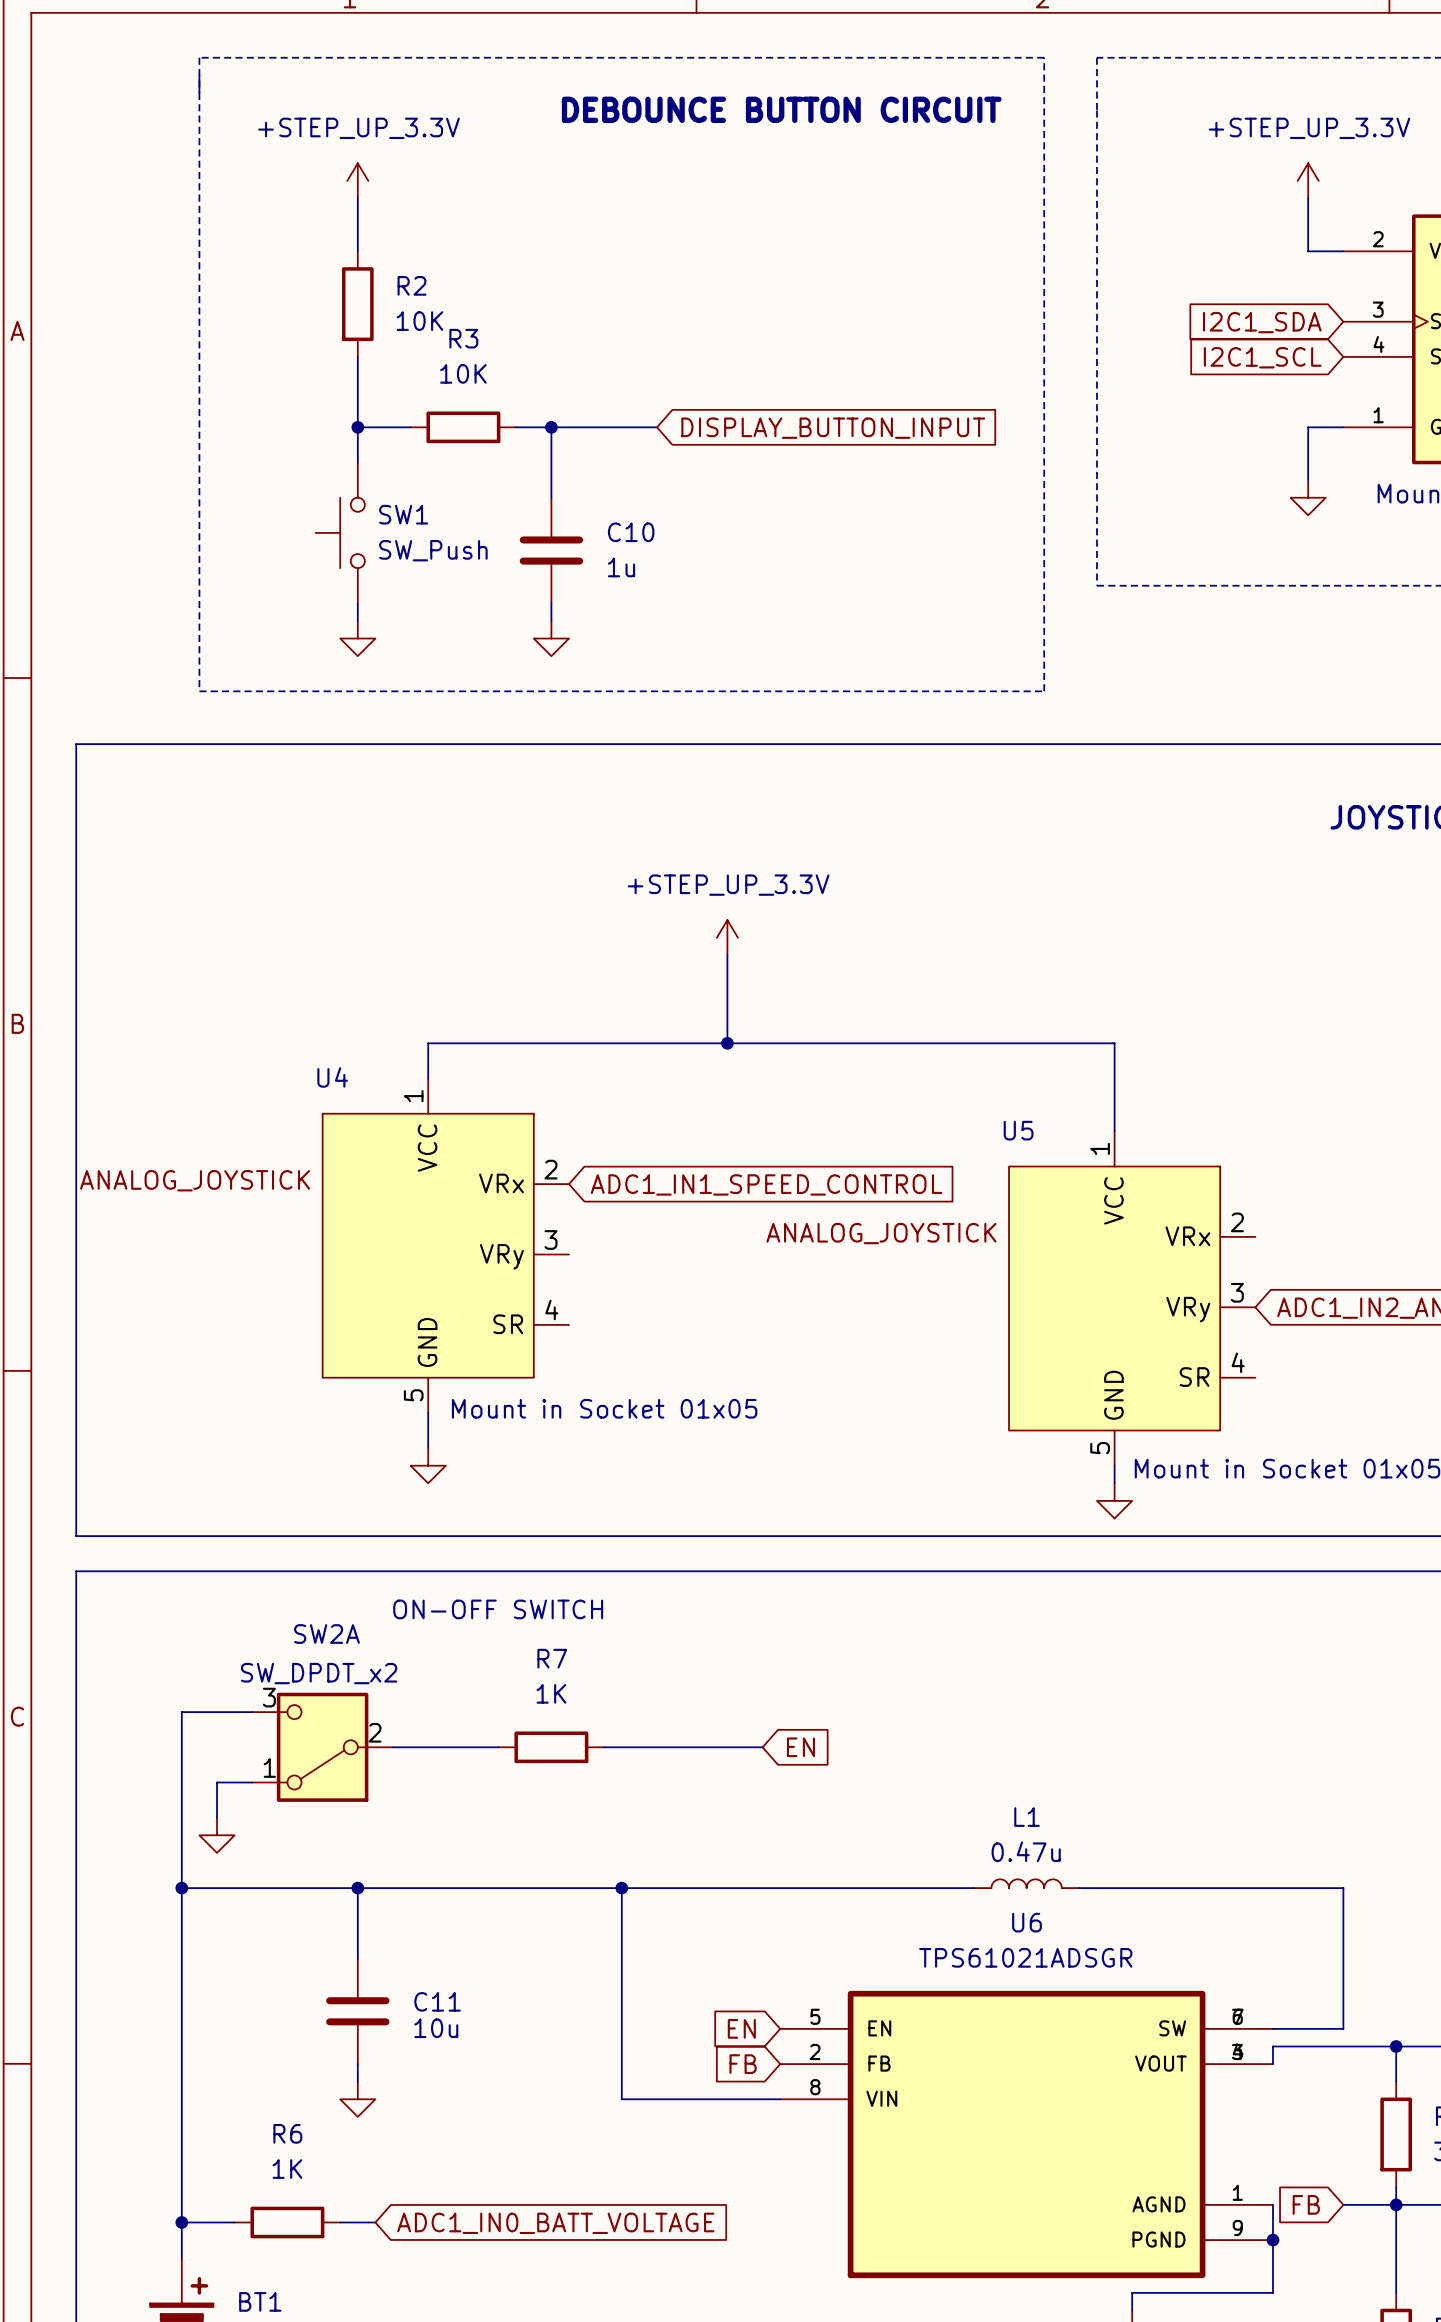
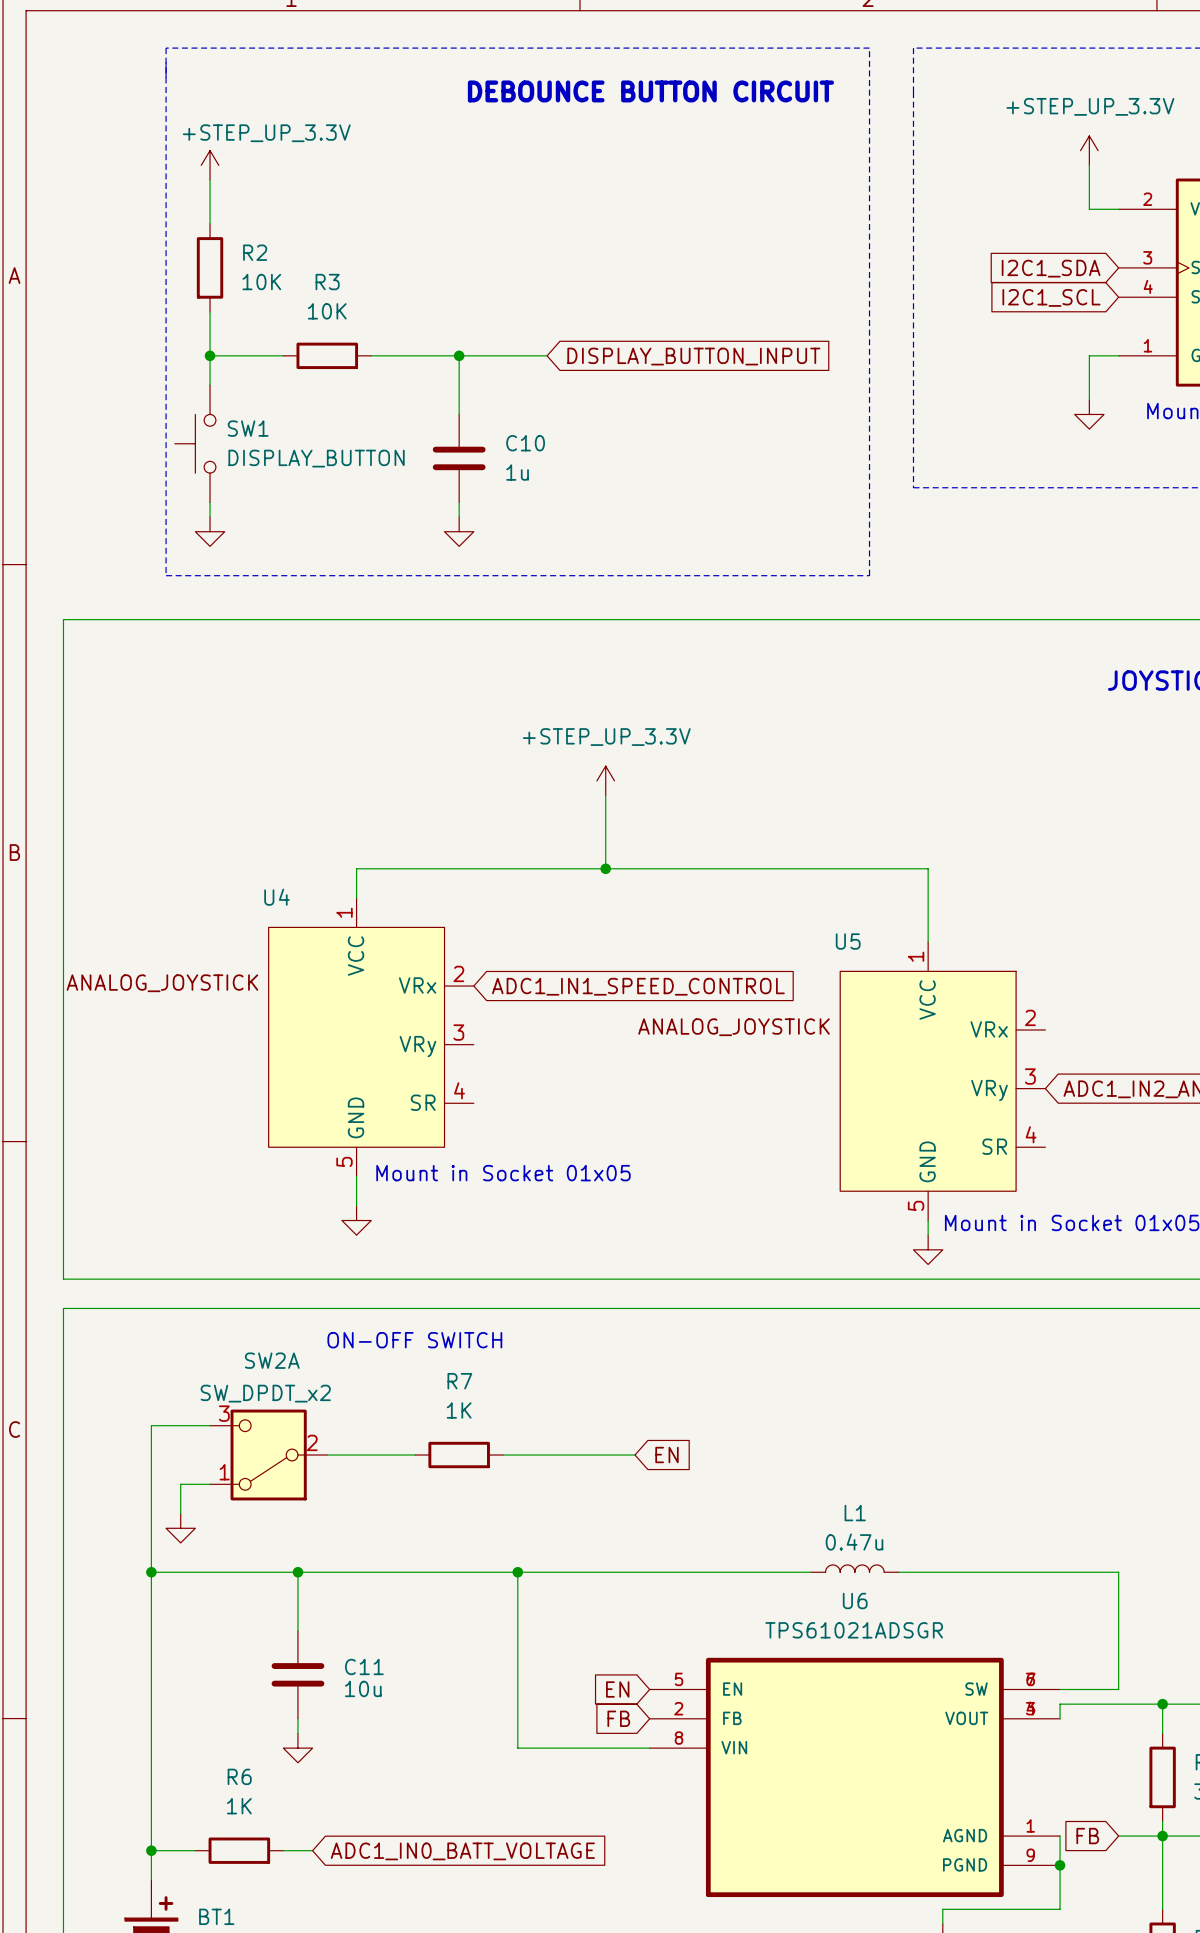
power symbol text position: +STEP_UP_3.3V (359, 128) -> +STEP_UP_3.3V (266, 133)
power symbol position: +STEP_UP_3.3V (357, 180) -> +STEP_UP_3.3V (210, 165)
wire: (357, 198) (357, 251) -> (210, 179) (210, 223)
R2 position: (357, 304) -> (210, 267)
wire: (357, 356) (357, 462) -> none
wire: none -> (210, 311) (210, 385)
wire: none -> (210, 355) (283, 355)
junction: none -> (210, 355)
wire: (357, 427) (410, 427) -> none
junction: (357, 427) -> none
wire: none -> (371, 355) (429, 355)
R3 position: (463, 427) -> (327, 355)
SW1 position: (340, 532) -> (195, 443)
SW1 value: SW_Push (433, 550) -> DISPLAY_BUTTON (316, 458)
wire: (357, 603) (357, 620) -> (210, 502) (210, 517)
power symbol position: (357, 638) -> (210, 531)

